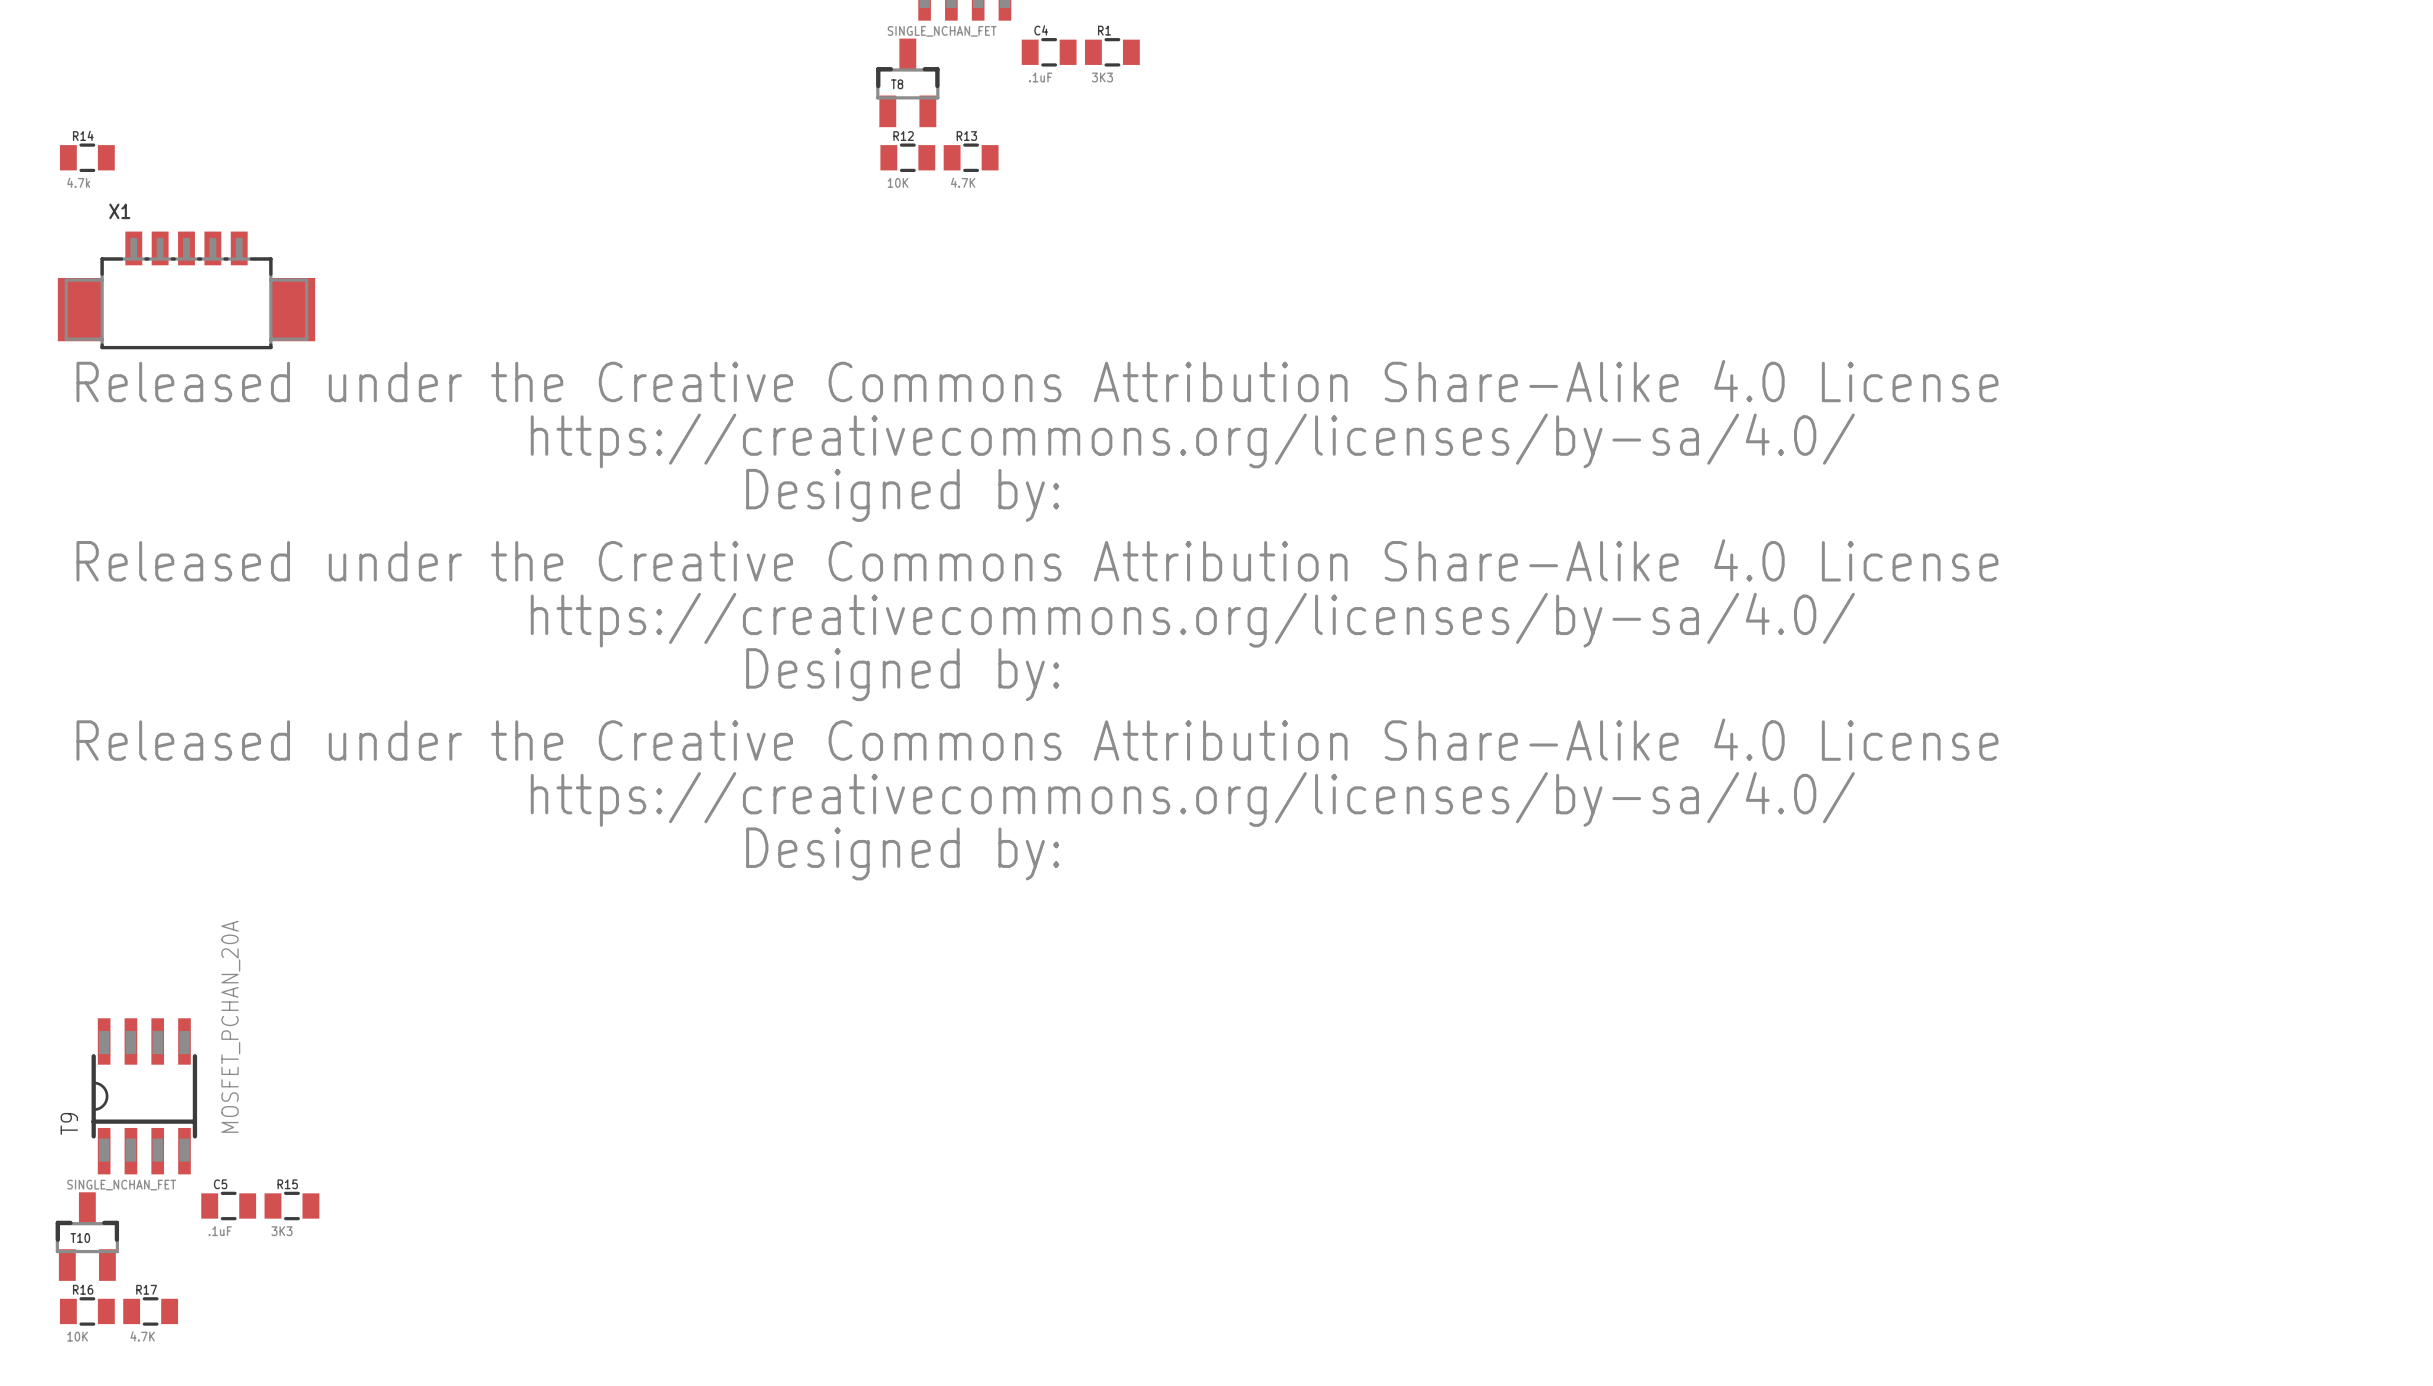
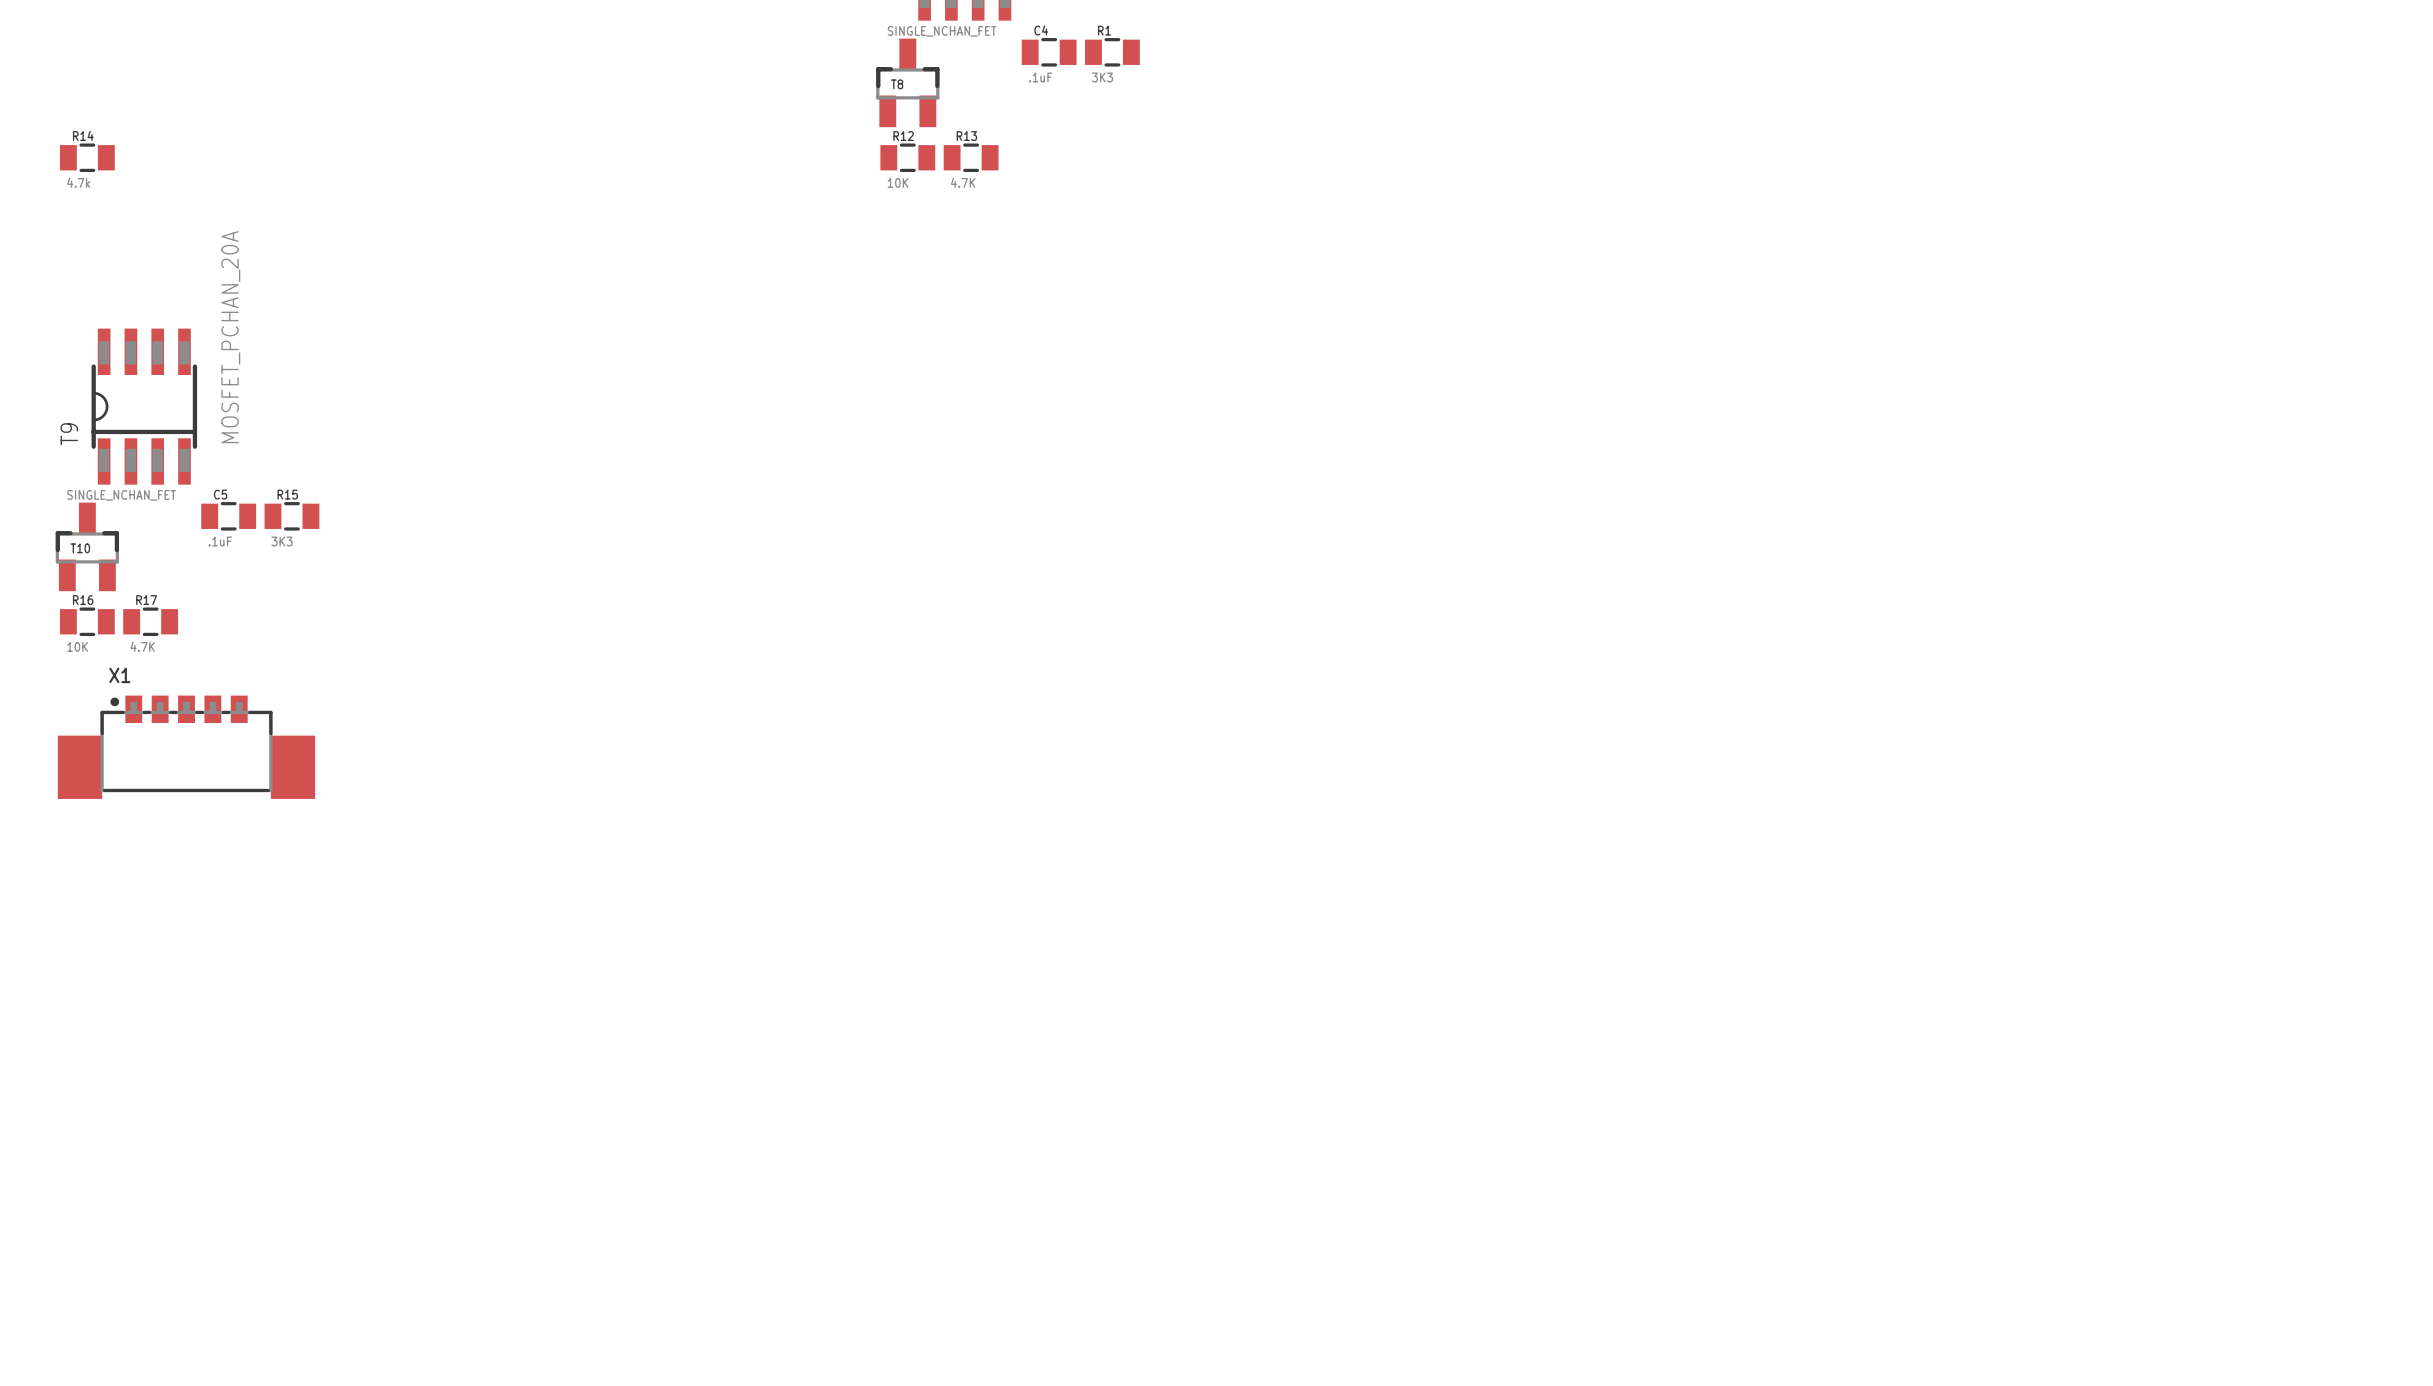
X1 footprint: [57, 231, 316, 350] -> [57, 695, 316, 799]
drawing: [76, 359, 1999, 881] -> none
T9 position: (144, 1096) -> (144, 406)
C5 position: (228, 1205) -> (228, 516)
R15 position: (291, 1205) -> (291, 516)
T10 position: (87, 1236) -> (87, 546)
R16 position: (87, 1311) -> (87, 621)
R17 position: (150, 1311) -> (150, 621)

